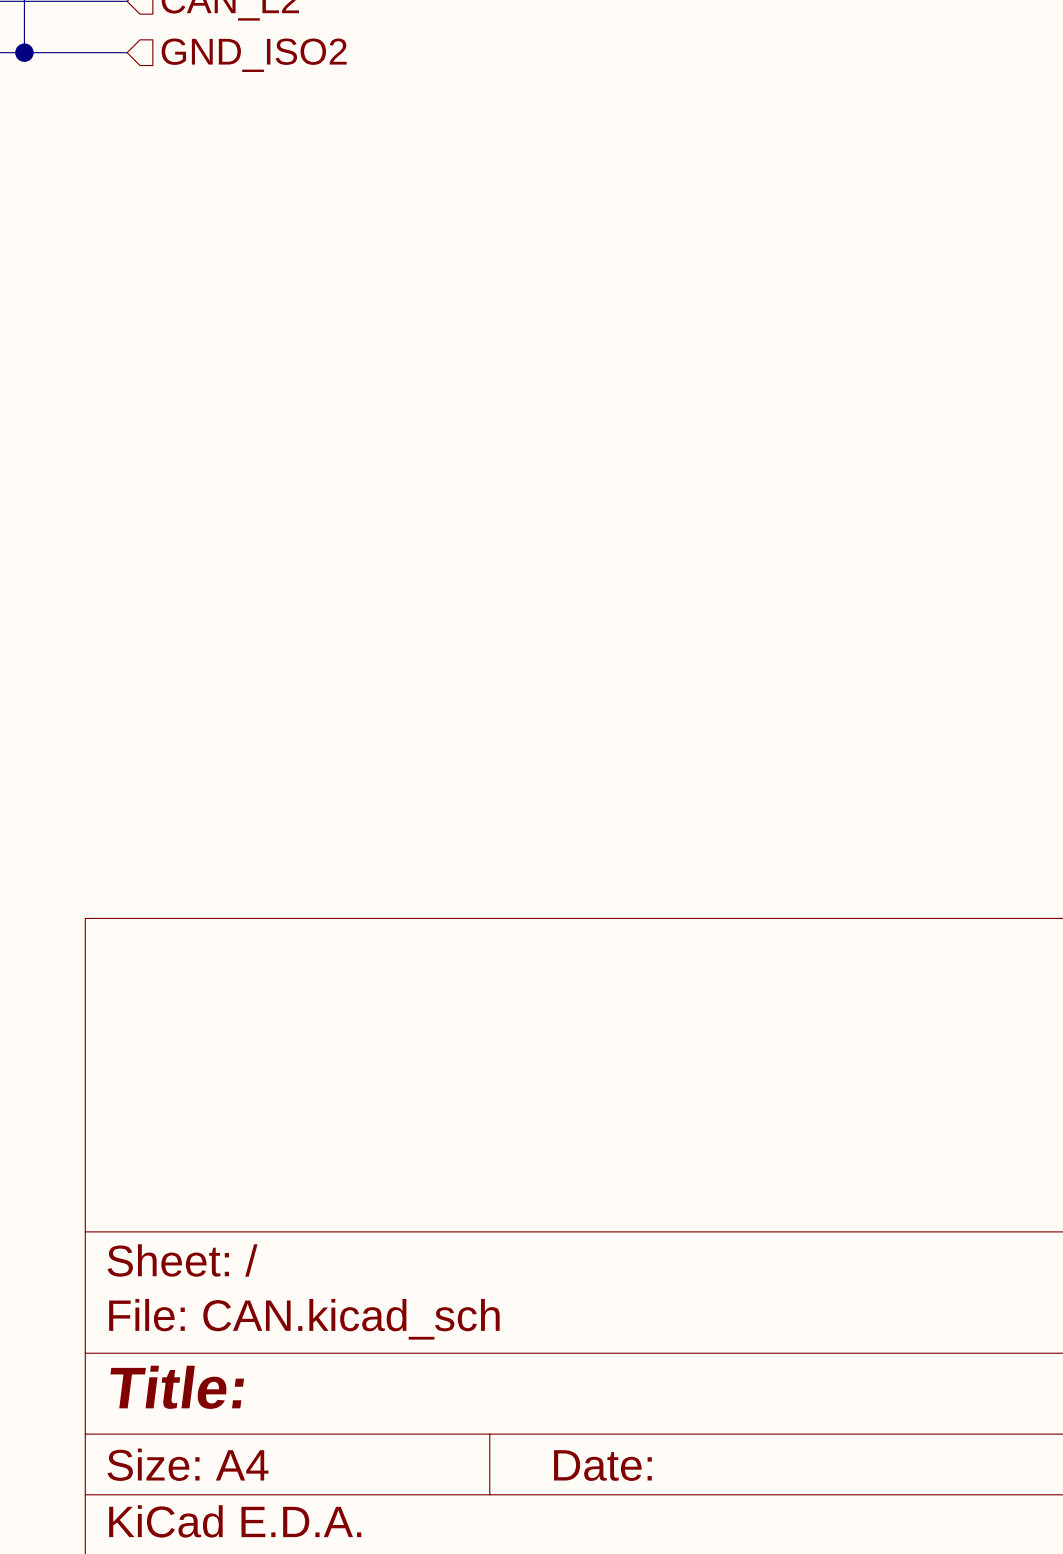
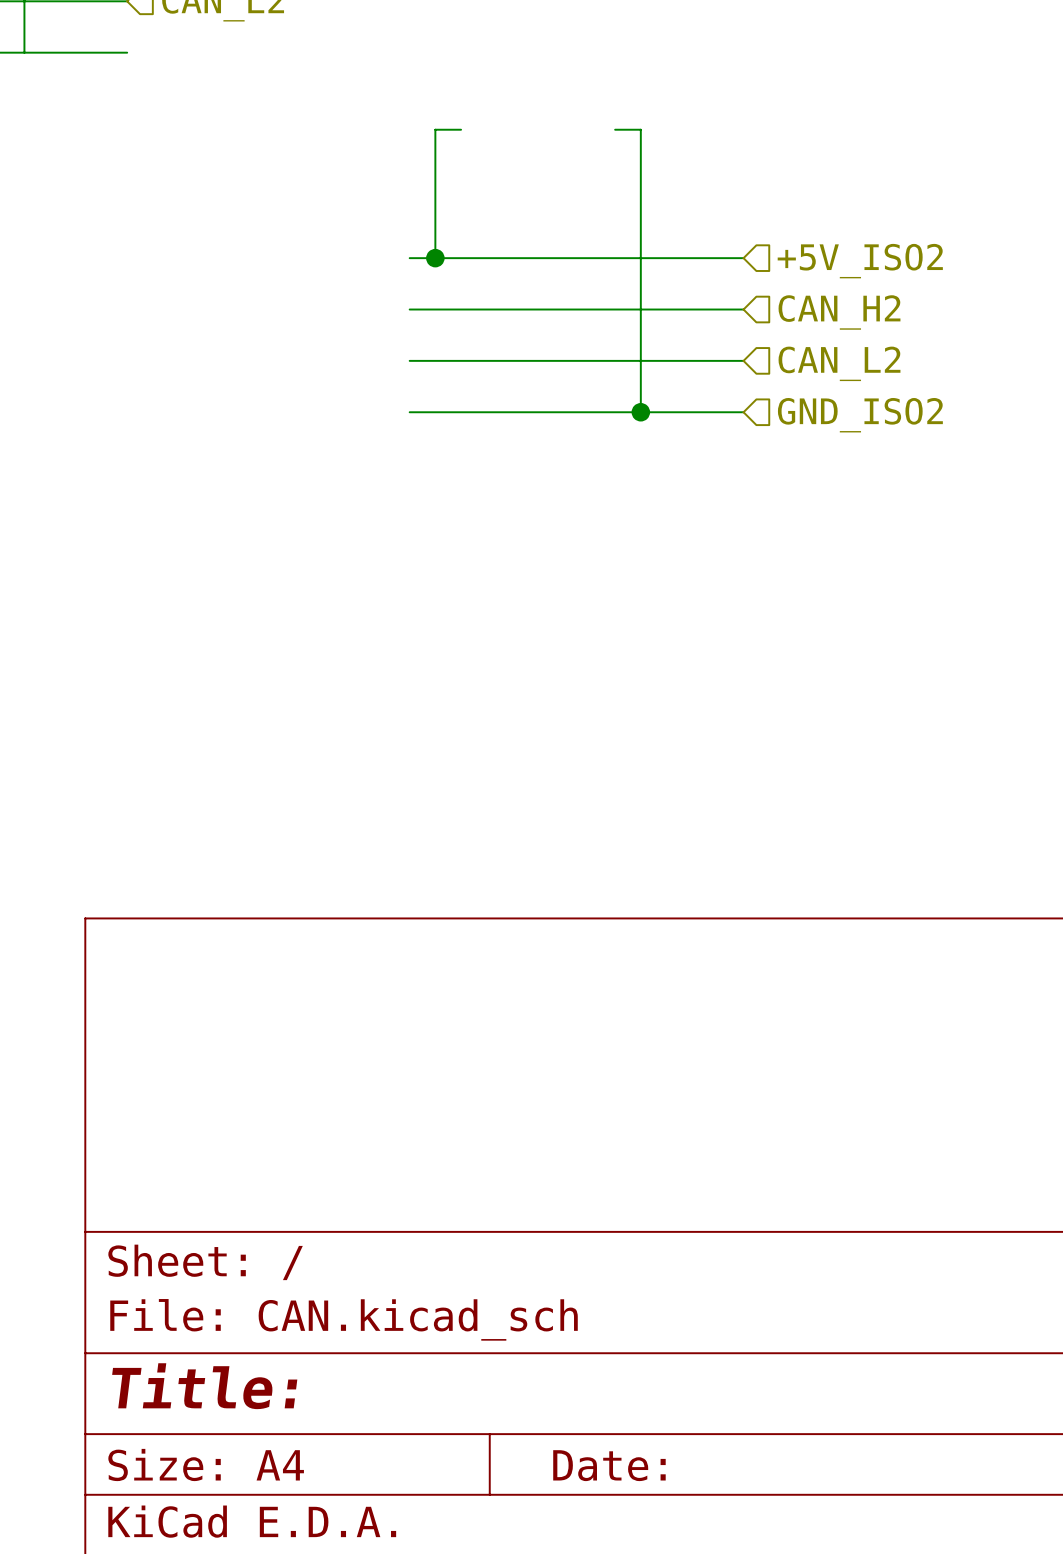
junction: (24, 52) -> none
hierarchical label: GND_ISO2 (254, 55) -> none
wire: none -> (461, 129) (435, 129) (435, 258)
wire: none -> (615, 129) (640, 129) (640, 412)
wire: none -> (409, 258) (743, 258)
junction: none -> (435, 258)
hierarchical label: none -> +5V_ISO2 (860, 261)
wire: none -> (409, 309) (743, 309)
hierarchical label: none -> CAN_H2 (839, 312)
wire: none -> (409, 360) (743, 360)
hierarchical label: none -> CAN_L2 (839, 363)
wire: none -> (409, 412) (743, 412)
junction: none -> (640, 412)
hierarchical label: none -> GND_ISO2 (860, 415)

